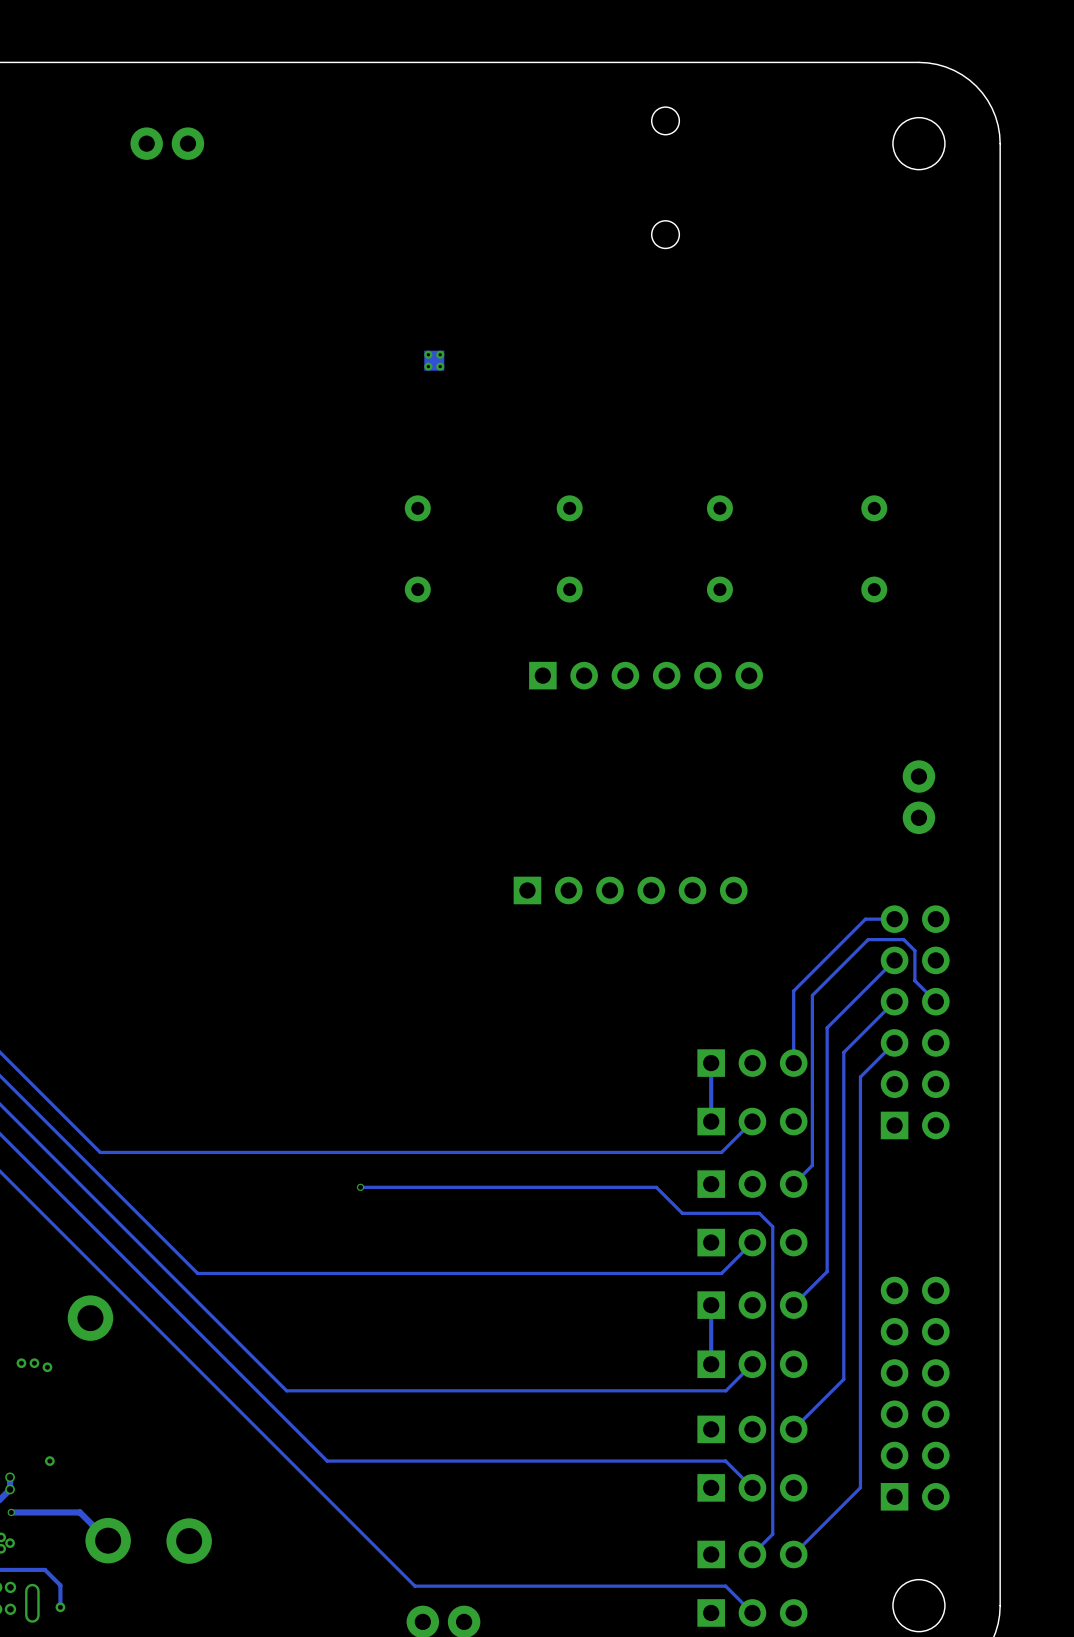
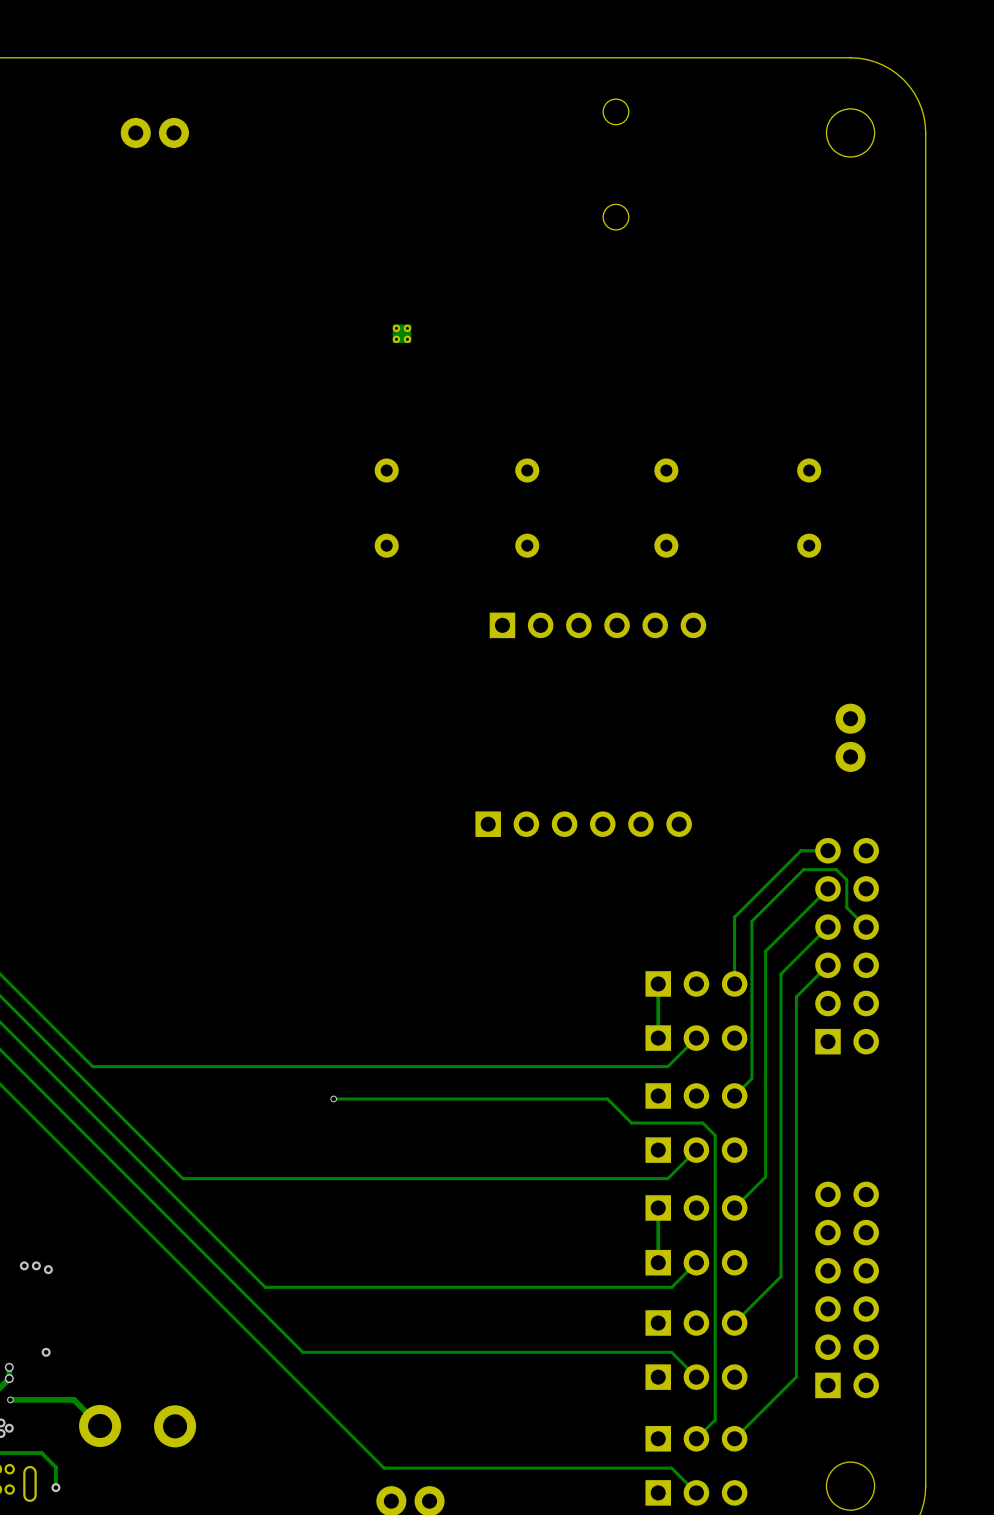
part: (90, 1318) -> none
via: (21, 1363) -> none
via: (34, 1363) -> none
via: none -> (24, 1265)
via: none -> (36, 1265)
via: (47, 1367) -> none
via: none -> (48, 1269)

